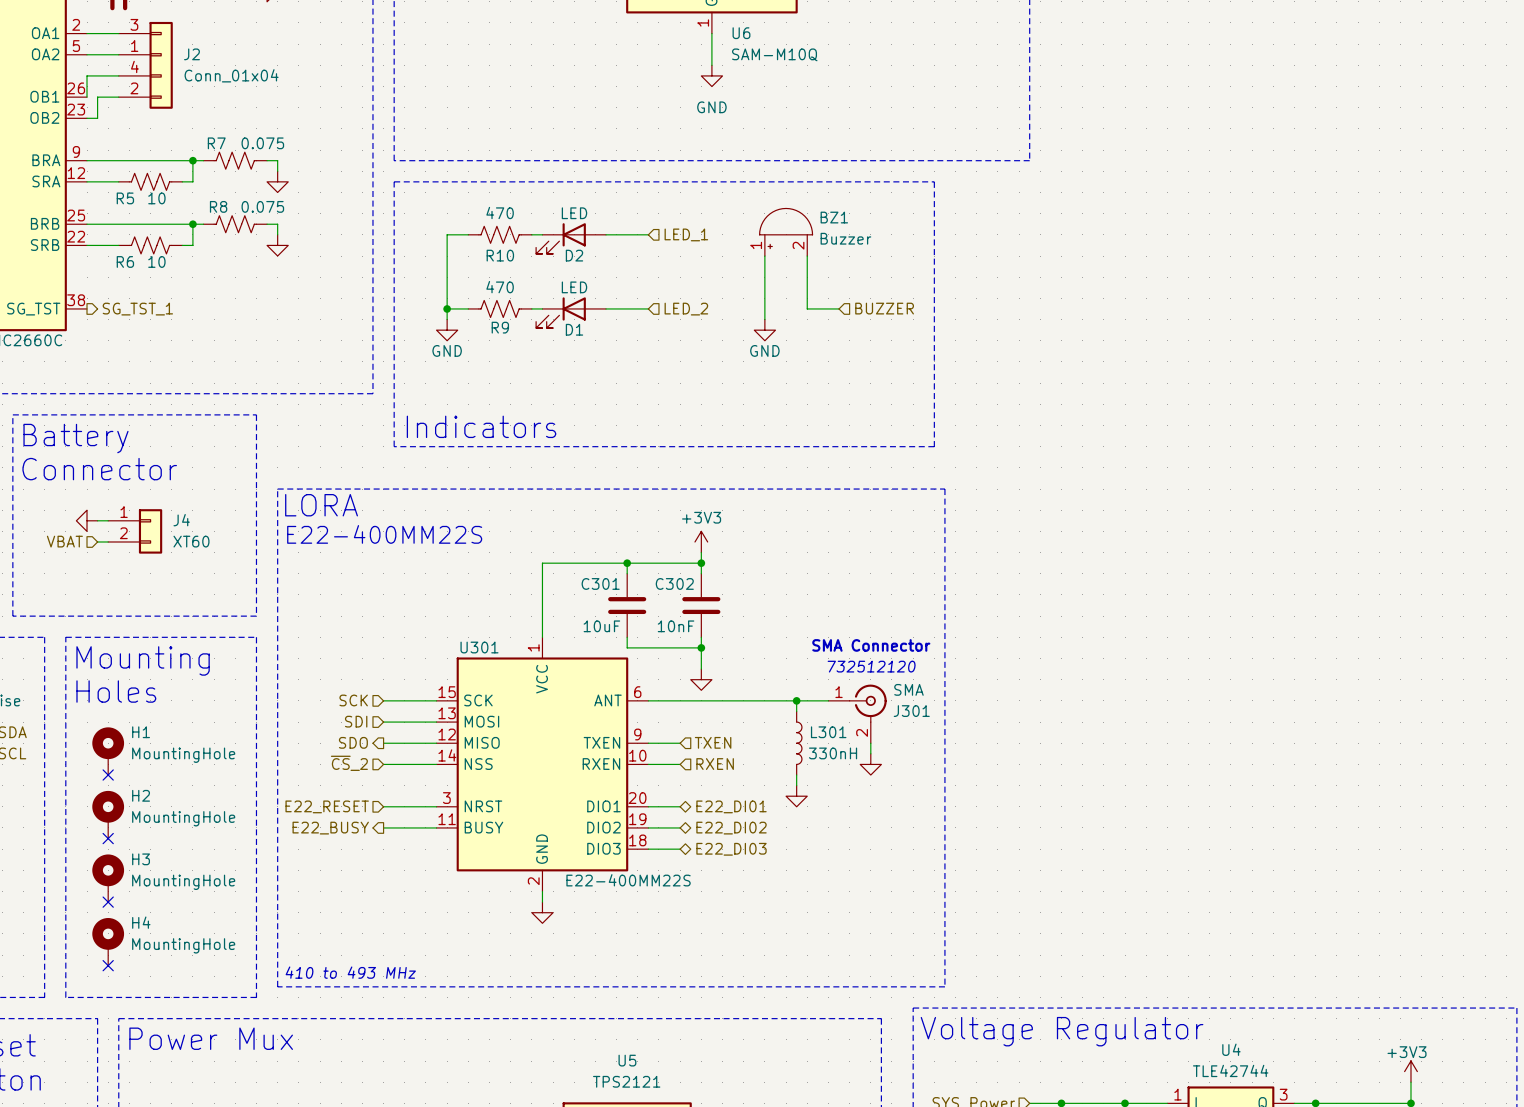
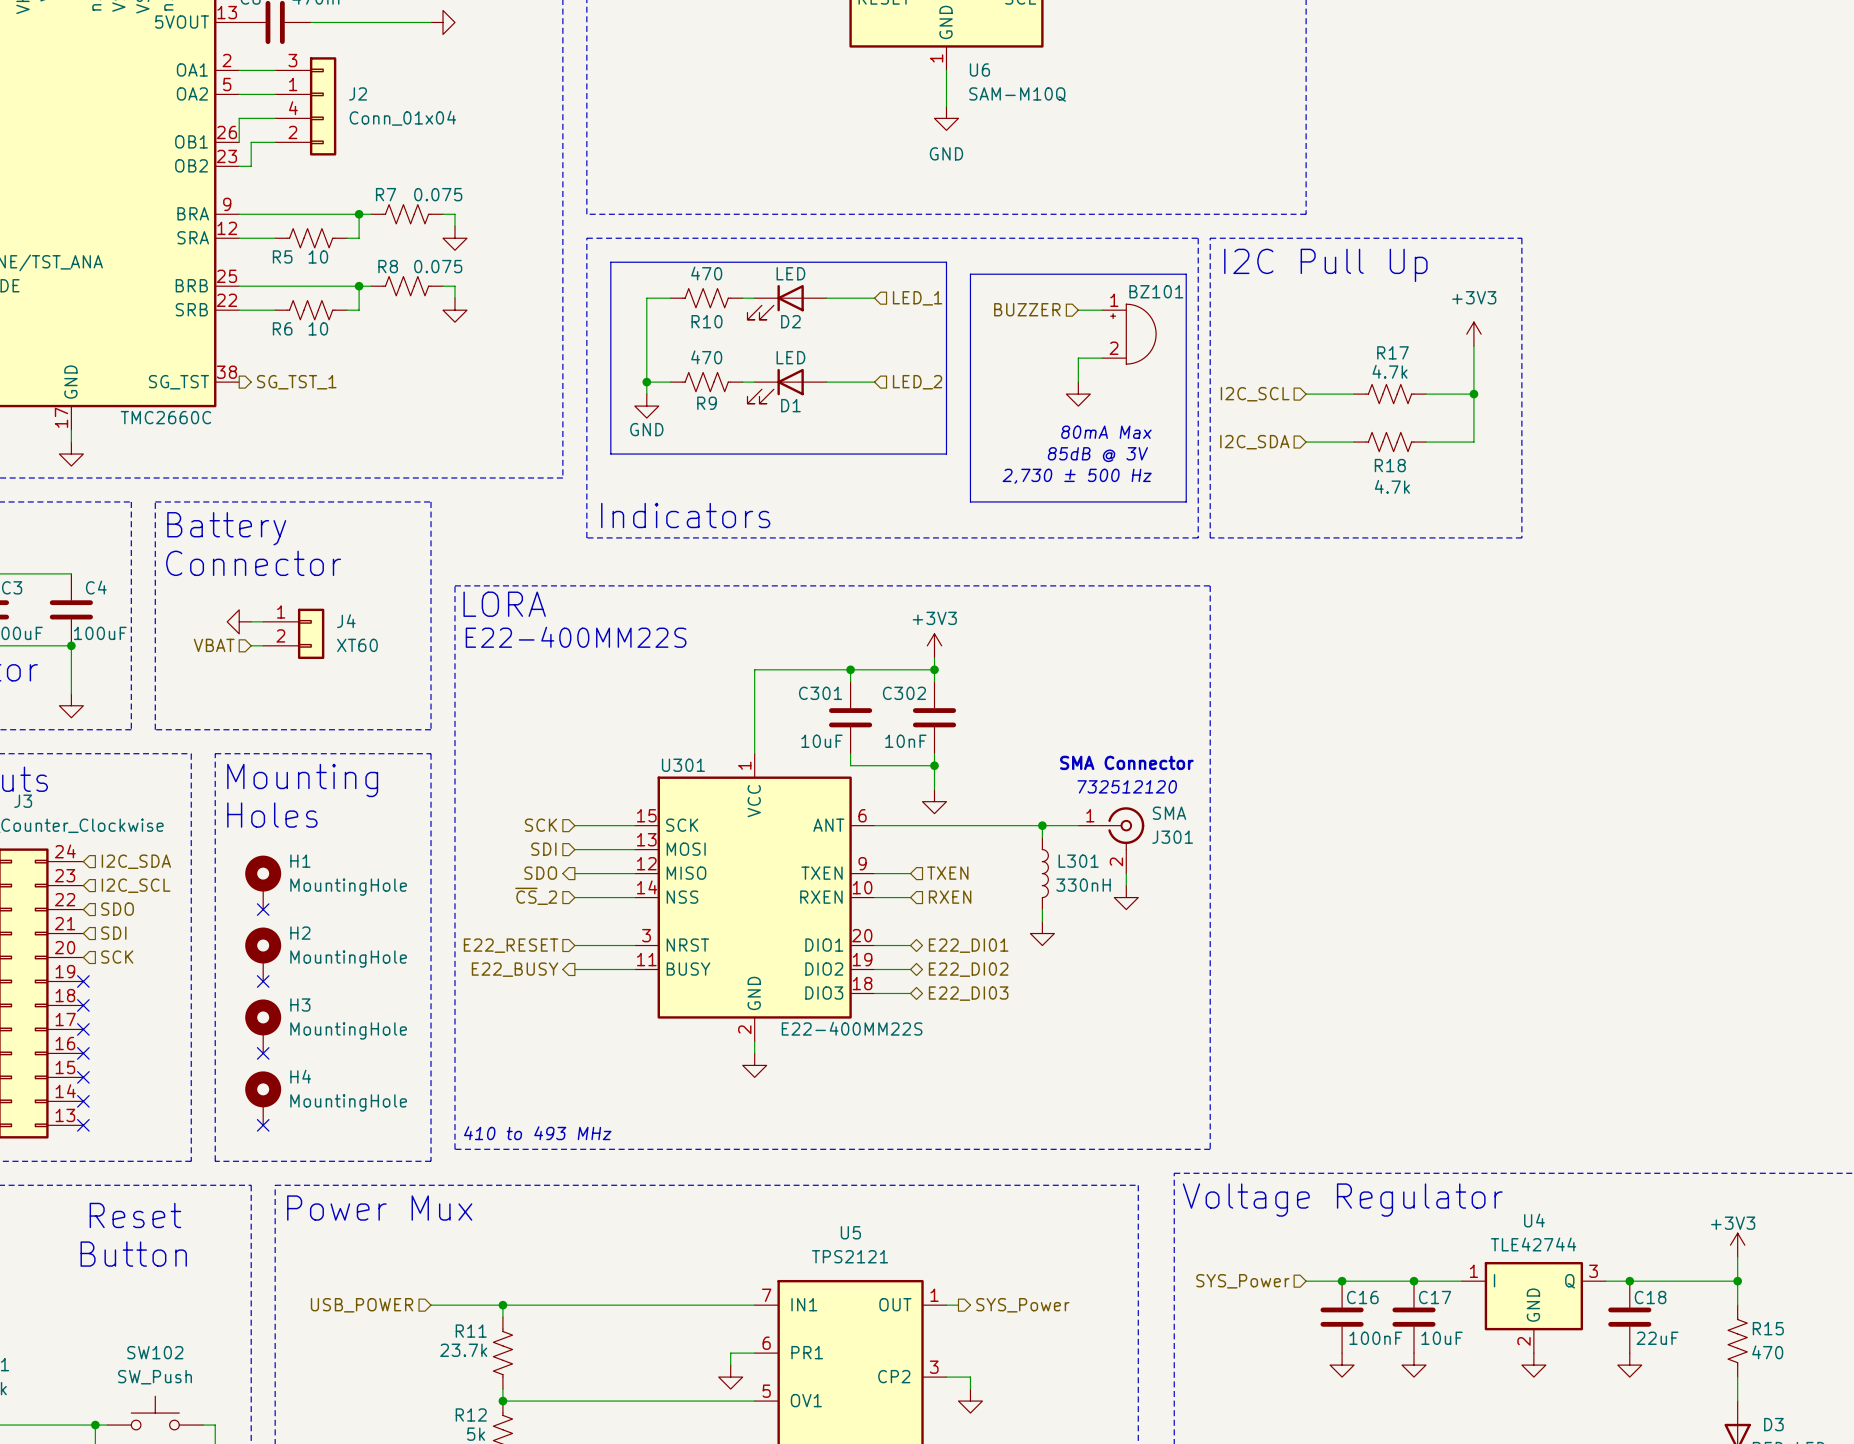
line: none -> (1210, 238) (1521, 238) (1521, 537) (1210, 537) (1210, 238)
line: none -> (610, 262) (946, 262) (946, 454) (610, 454) (610, 262)
text: none -> I2C Pull Up (1325, 265)
line: none -> (970, 274) (1186, 274) (1186, 501) (970, 501) (970, 274)
BZ1: Buzzer (786, 232) -> none
wire: none -> (1078, 310) (1102, 310)
wire: (764, 256) (764, 319) -> none
wire: (807, 256) (807, 308) (839, 308) -> none
BZ101: none -> (1129, 334)
power symbol: none -> +3V3 (1473, 334)
wire: none -> (1473, 346) (1473, 442) (1425, 442)
wire: none -> (1102, 358) (1078, 358) (1078, 382)
hierarchical label rotation: 0° (884, 308) -> 180° (1027, 309)
hierarchical label position: BUZZER (884, 308) -> BUZZER (1027, 309)
power symbol: none -> (1078, 394)
hierarchical label: none -> I2C_SCL (1255, 394)
wire: none -> (1306, 394) (1354, 394)
R17: none -> 4.7k (1390, 394)
wire: none -> (1425, 394) (1473, 394)
junction: none -> (1473, 394)
power symbol: GND (764, 330) -> none
text: none -> 80mA Max (1106, 432)
wire: none -> (1306, 442) (1354, 442)
R18: none -> 4.7k (1390, 442)
hierarchical label: none -> I2C_SDA (1254, 442)
text: none -> 85dB @ 3V (1097, 454)
text: none -> 2,730 ± 500 Hz (1077, 476)

